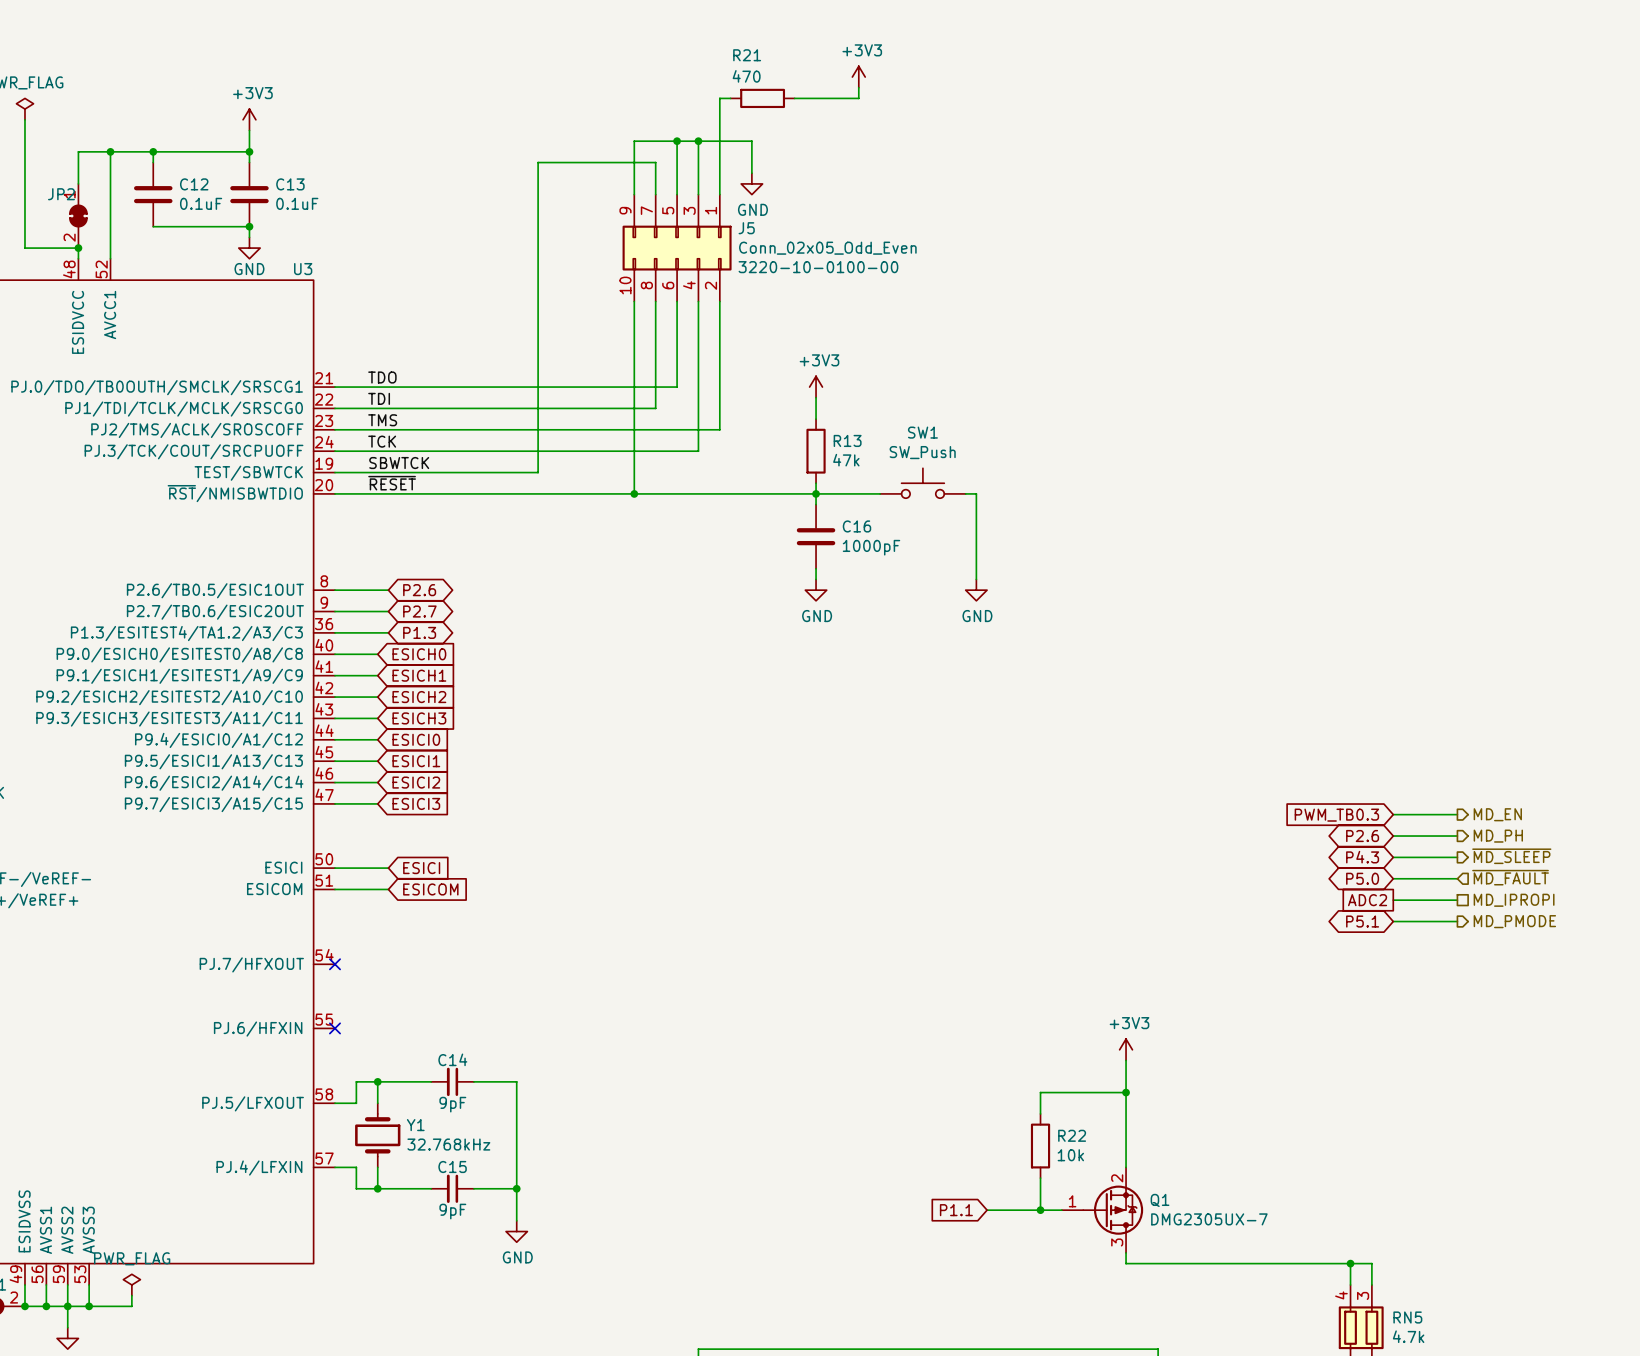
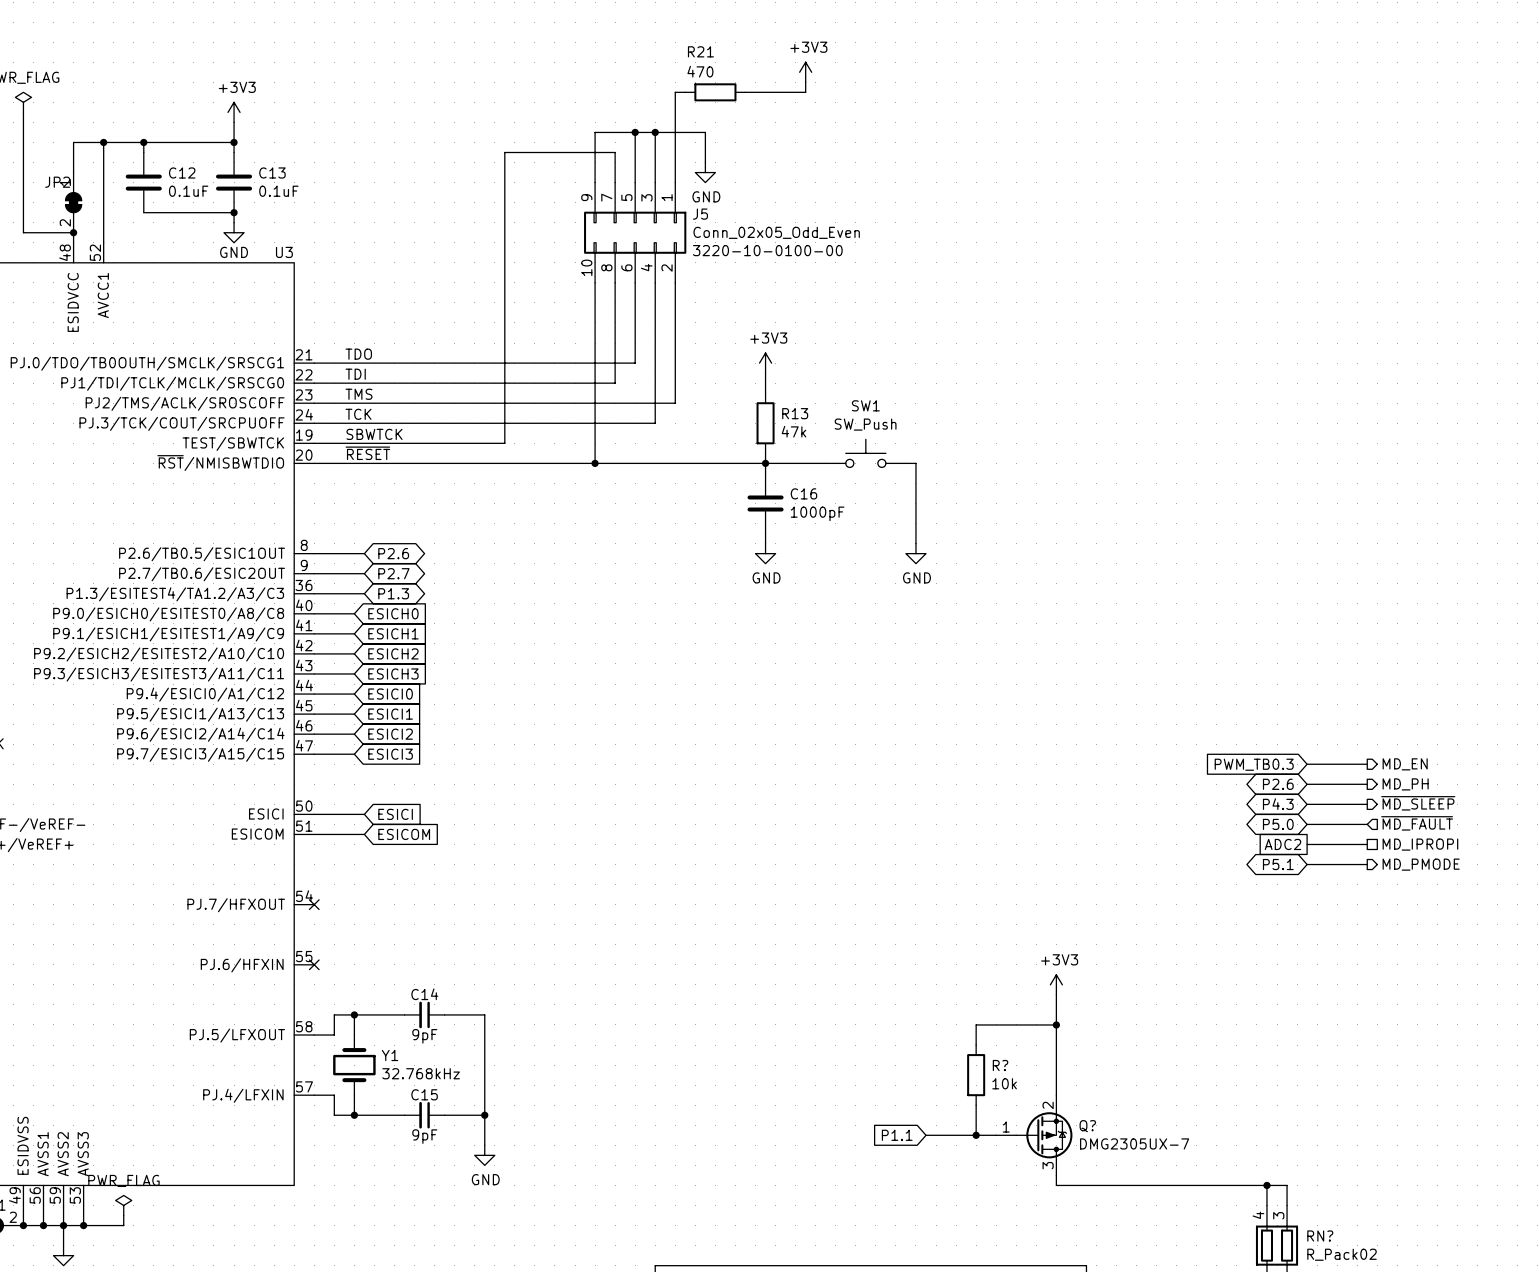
R22 name: R22 (1072, 1135) -> R? (1000, 1065)
Q1 name: Q1 (1160, 1200) -> Q? (1087, 1126)
RN5 name: RN5 (1407, 1317) -> RN? (1320, 1236)
RN5 value: 4.7k (1408, 1336) -> R_Pack02 (1342, 1254)

